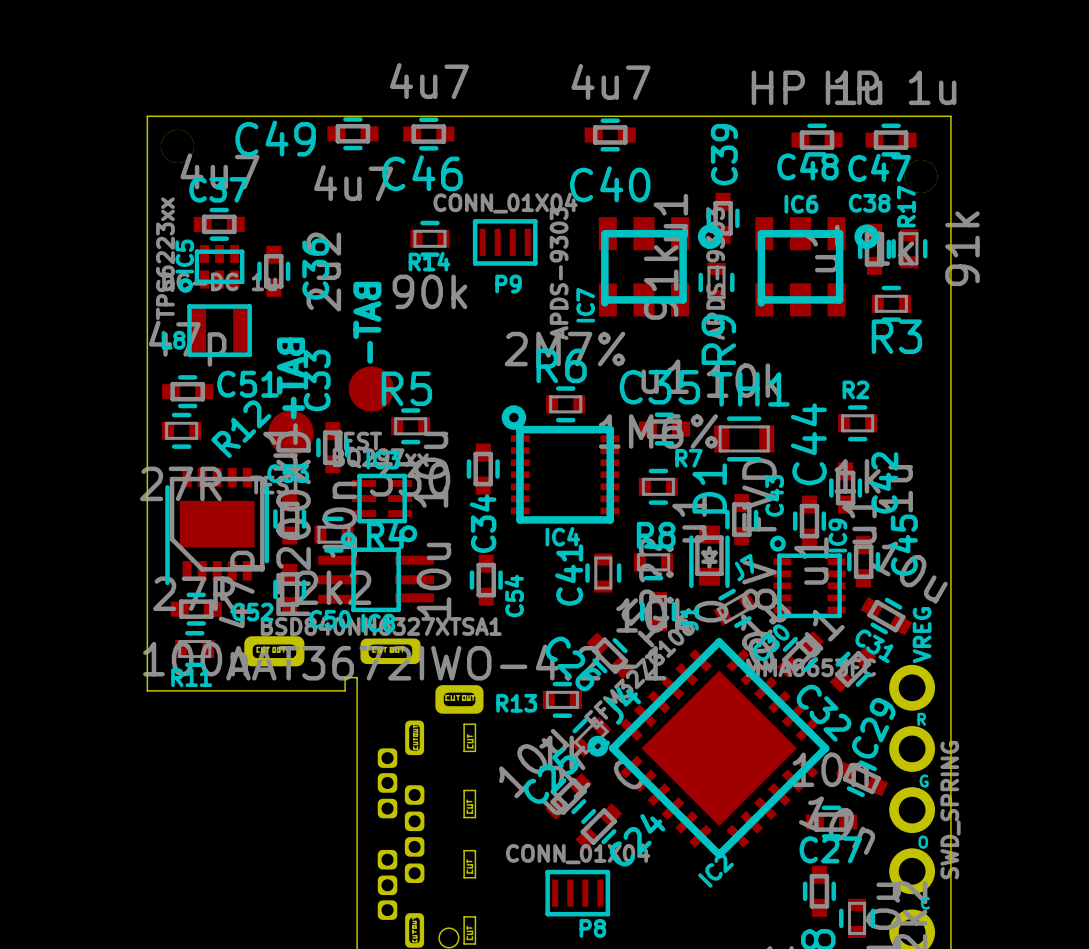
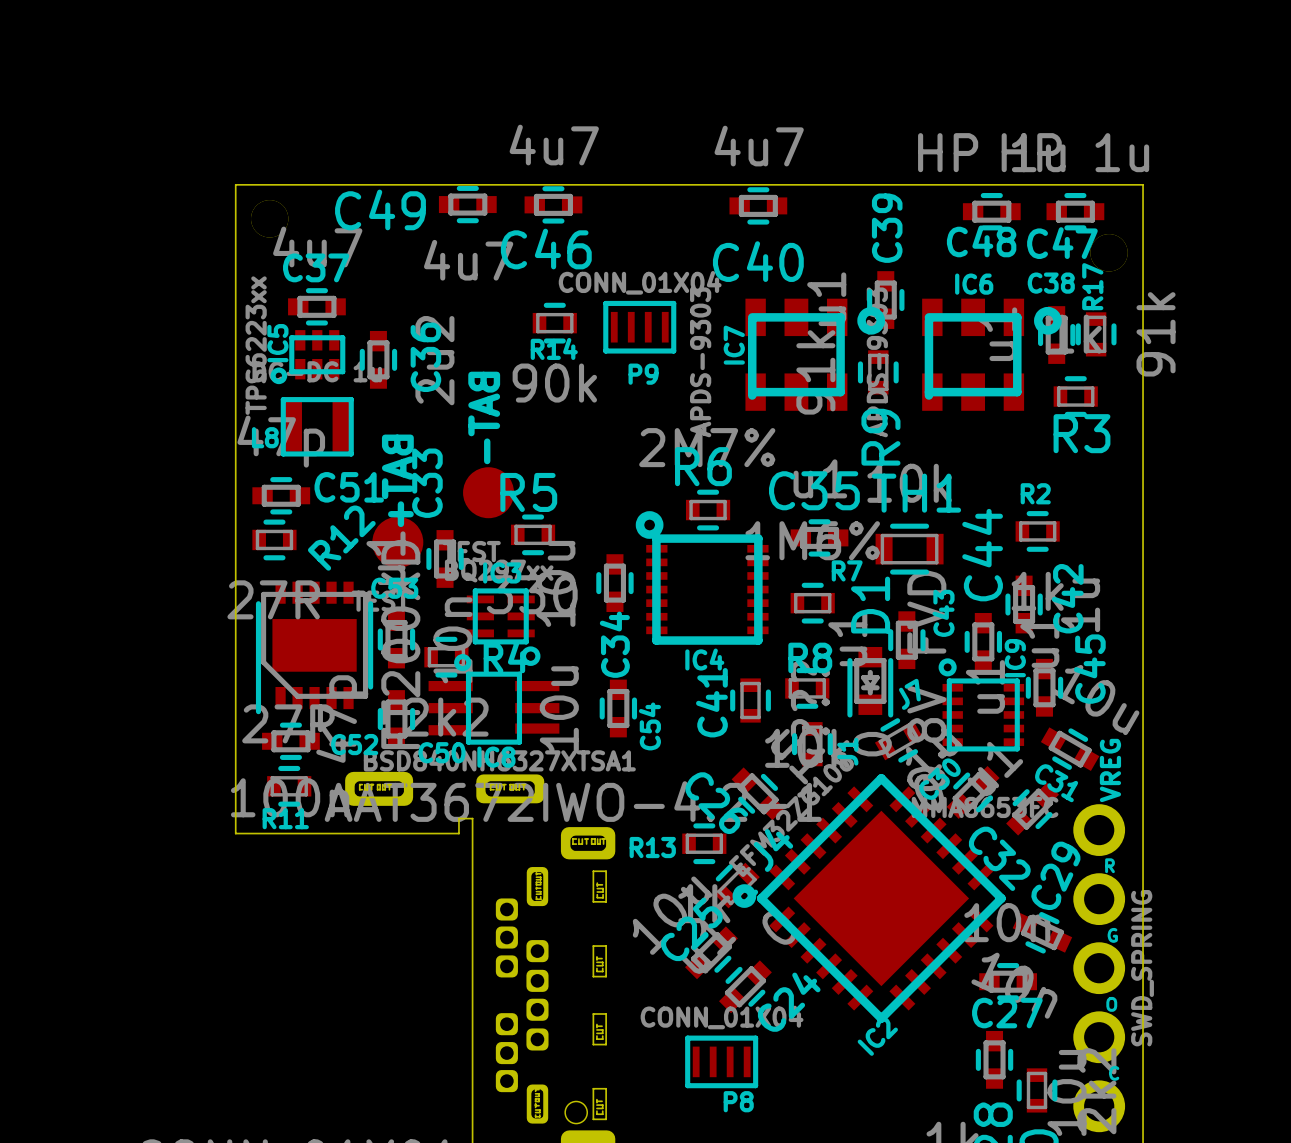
IC7 name position: IC7 (585, 305) -> IC7 (734, 345)

